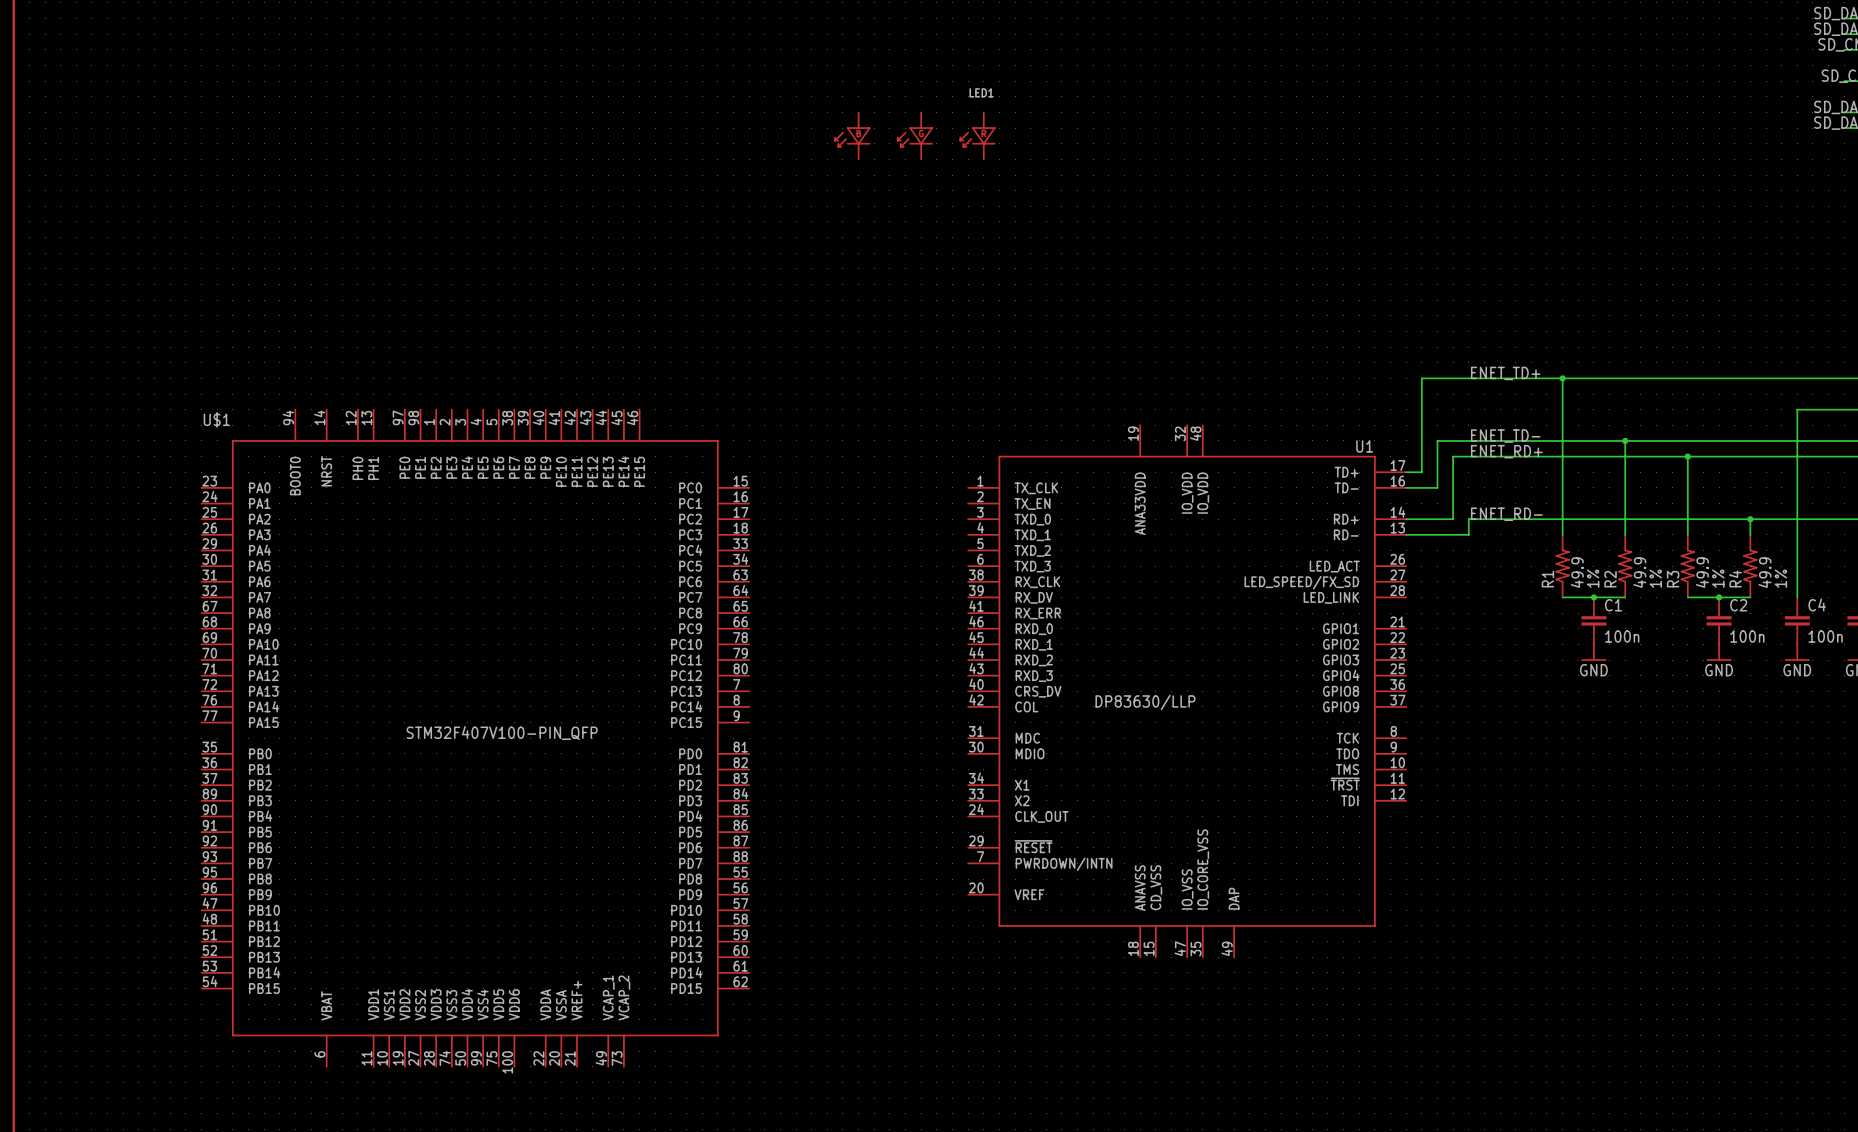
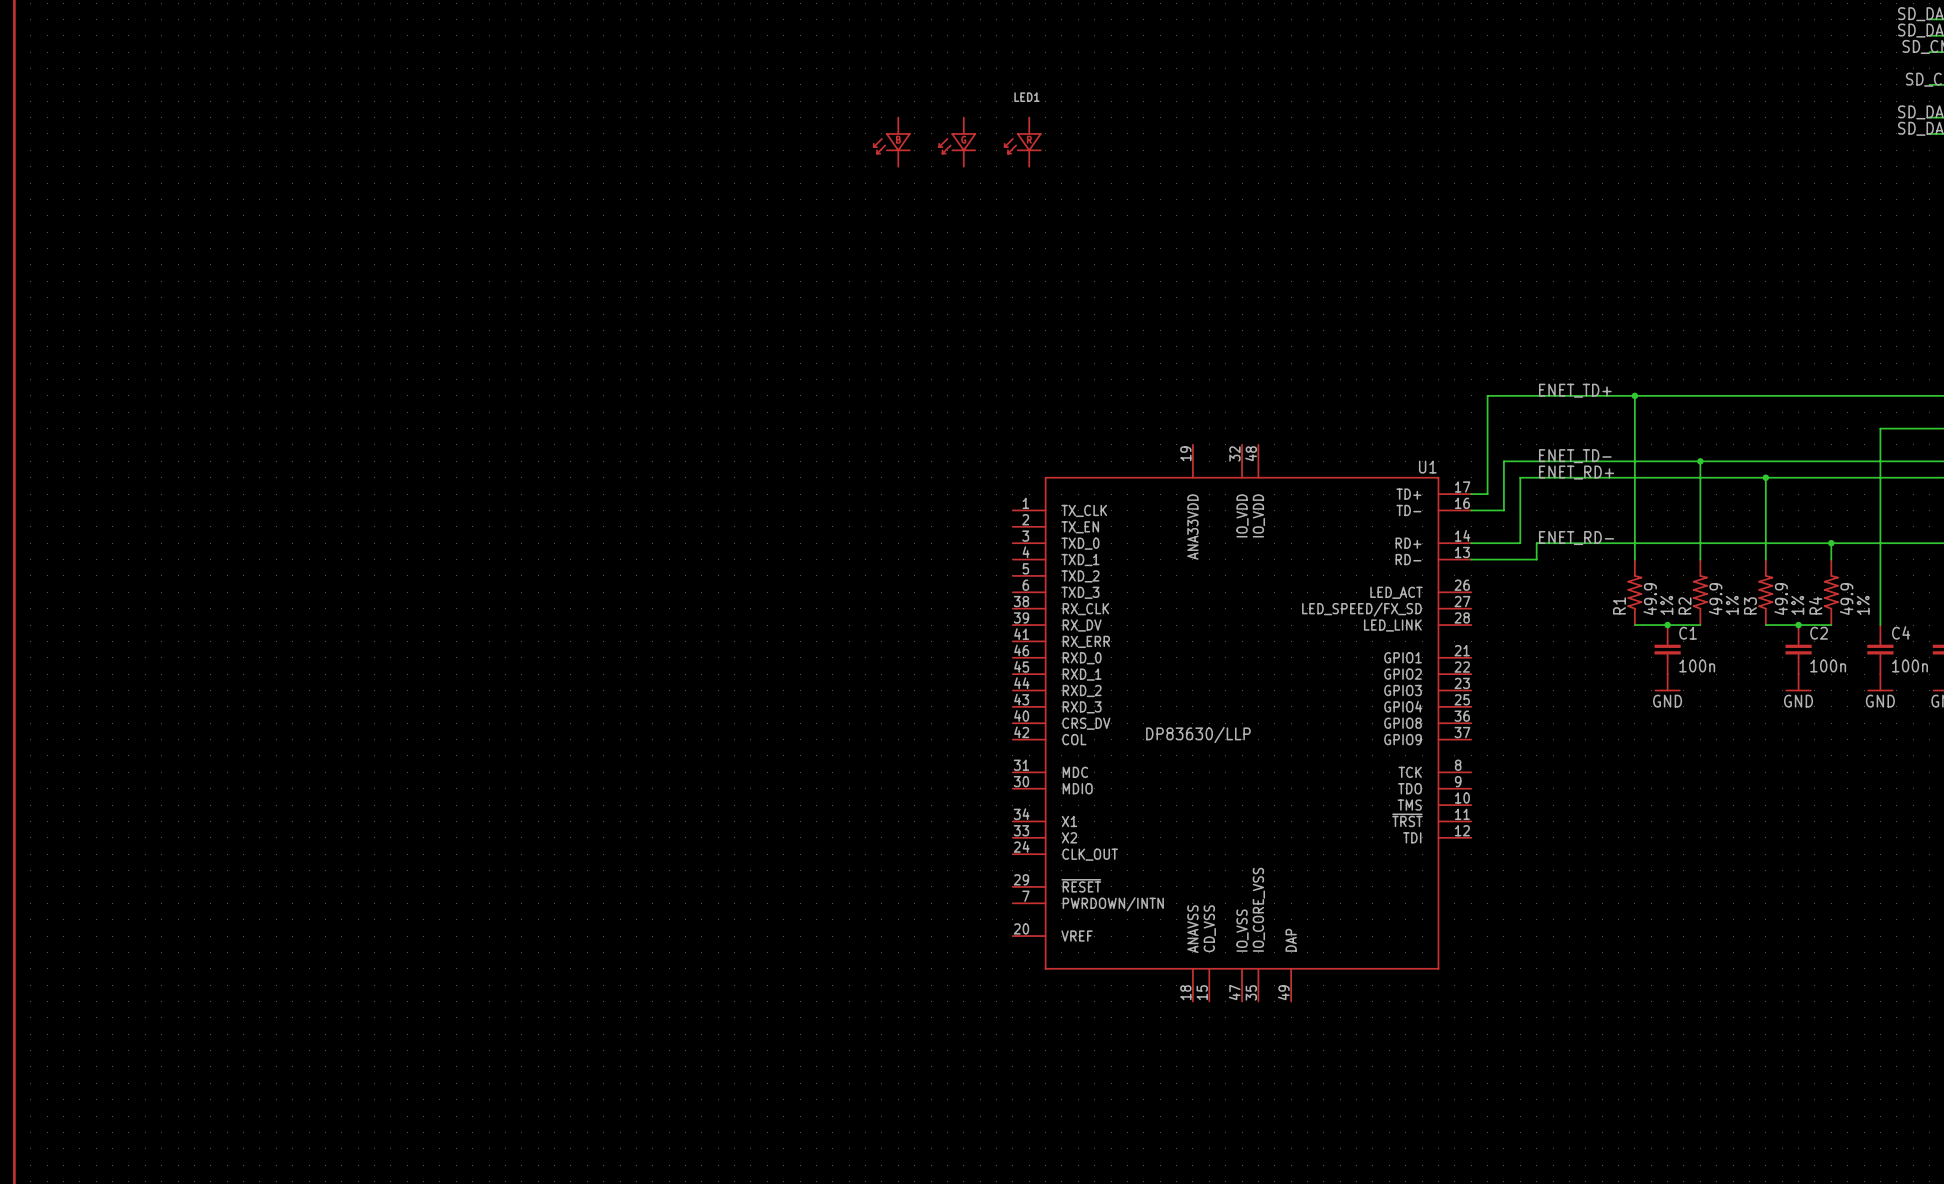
U$1: STM32F407V100-PIN_QFP (475, 738) -> none

